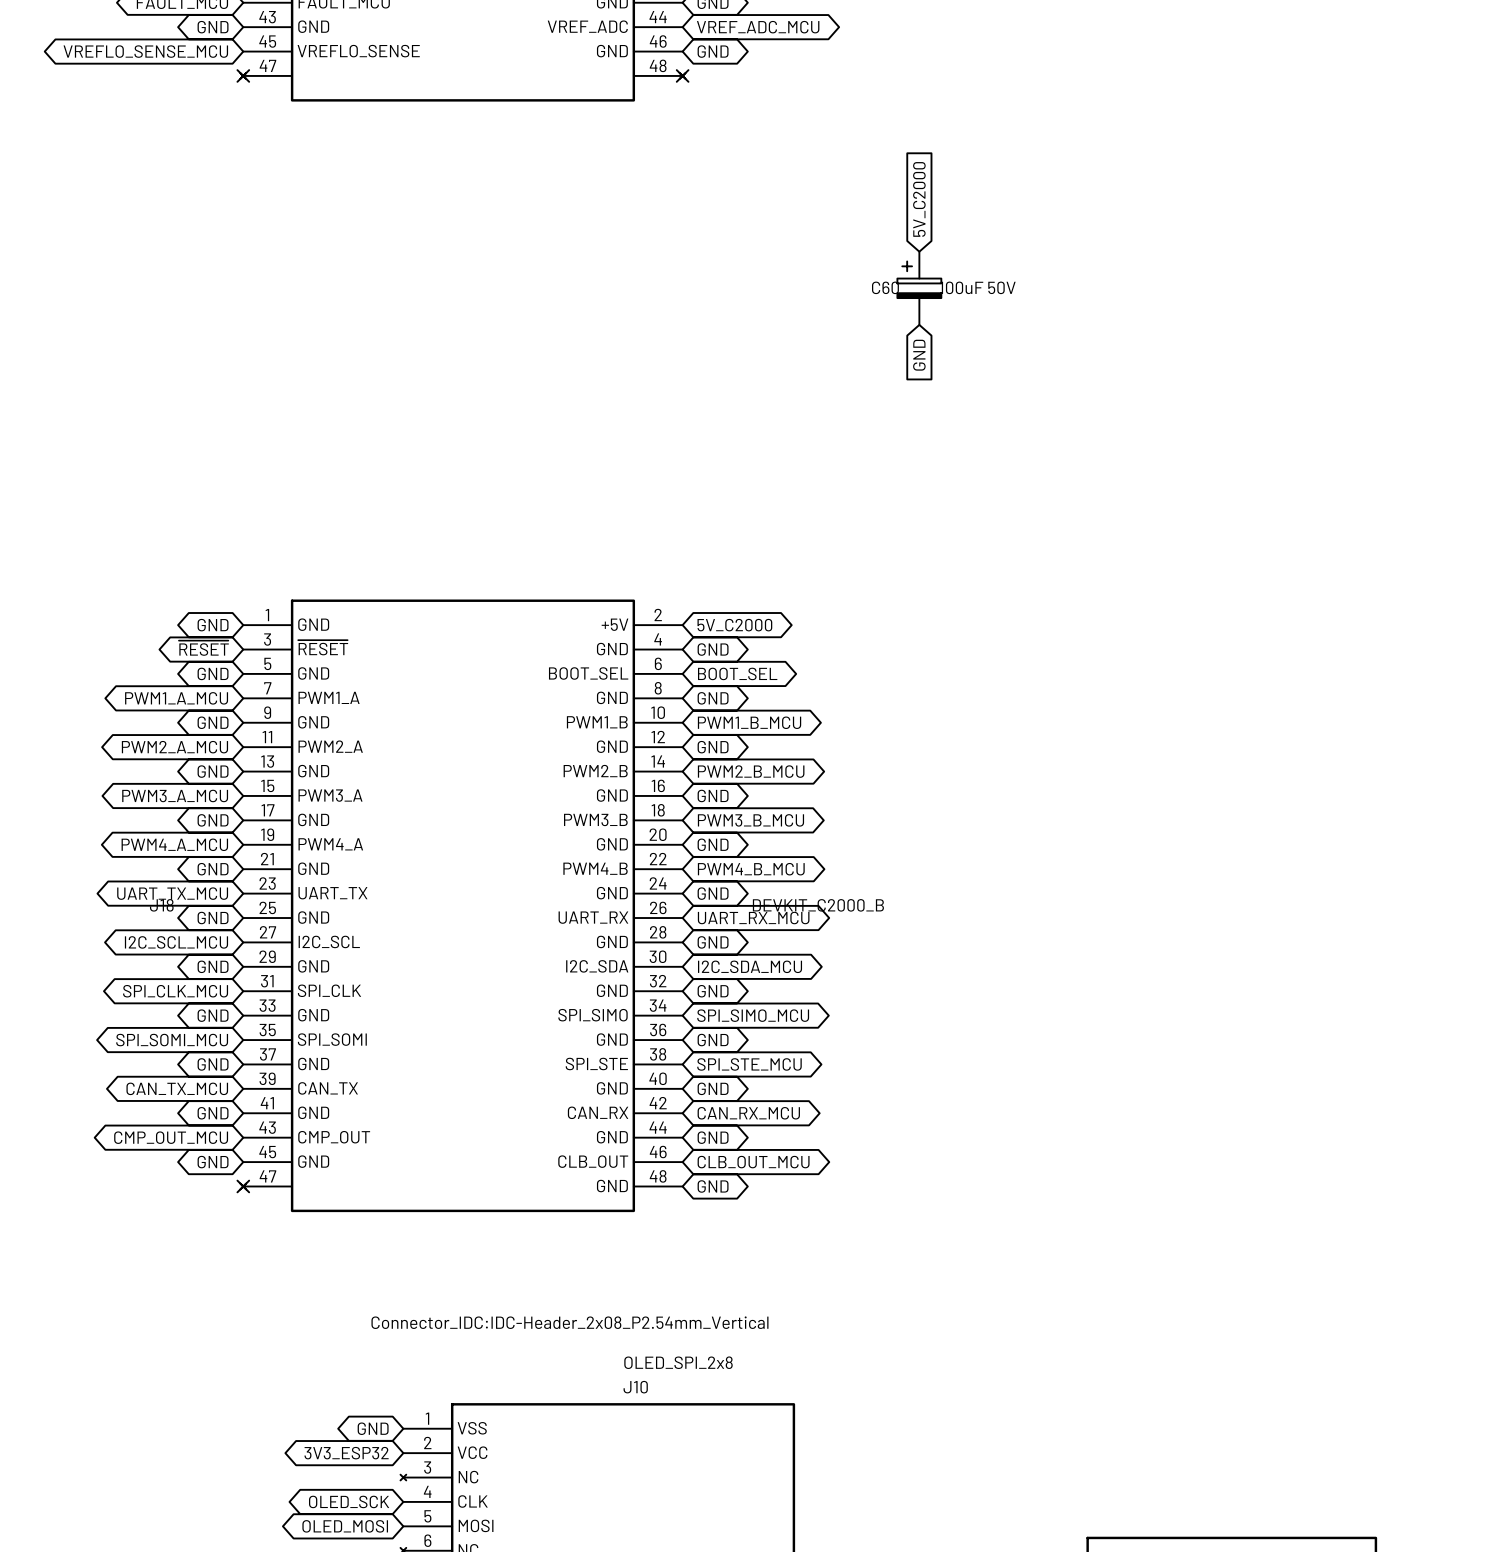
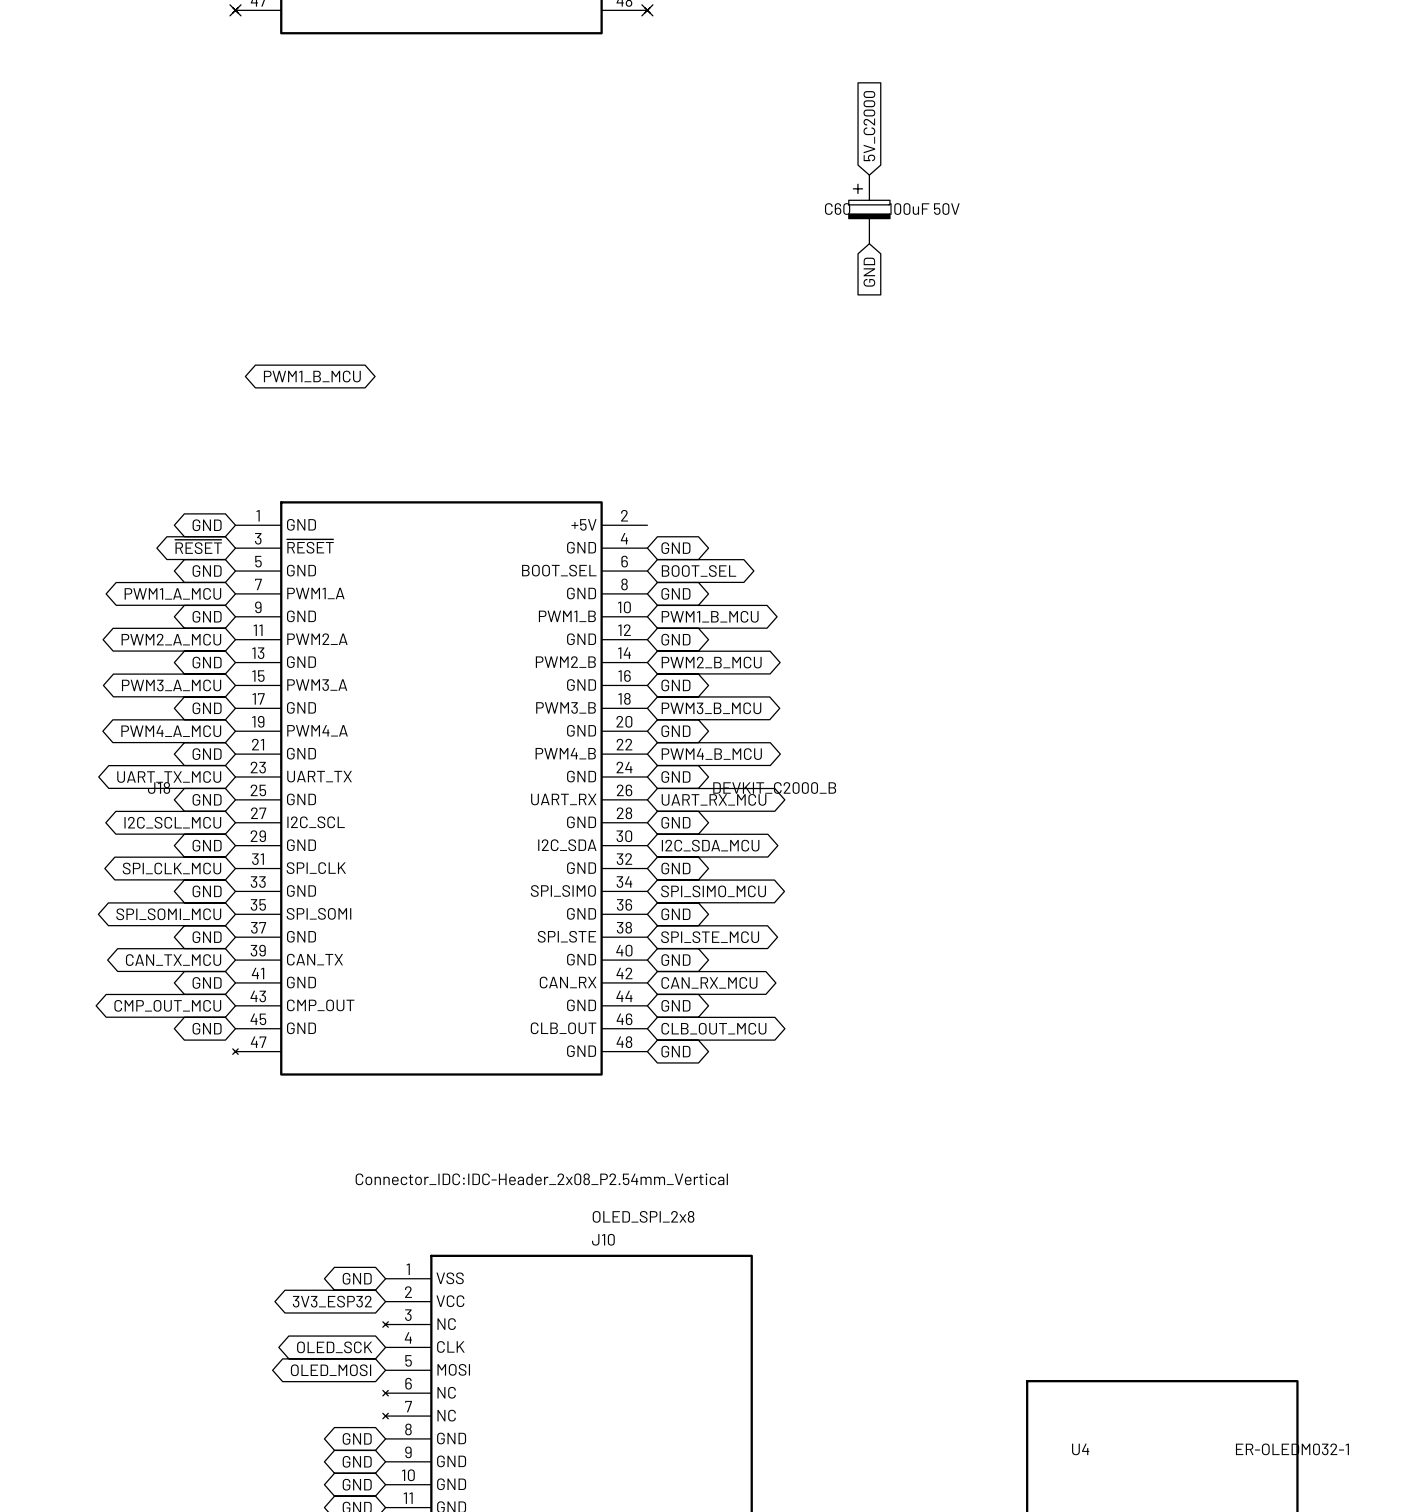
global label: none -> PWM1_B_MCU (312, 376)
global label: 5V_C2000 (734, 625) -> none
no-connect mark: (243, 1186) -> none

